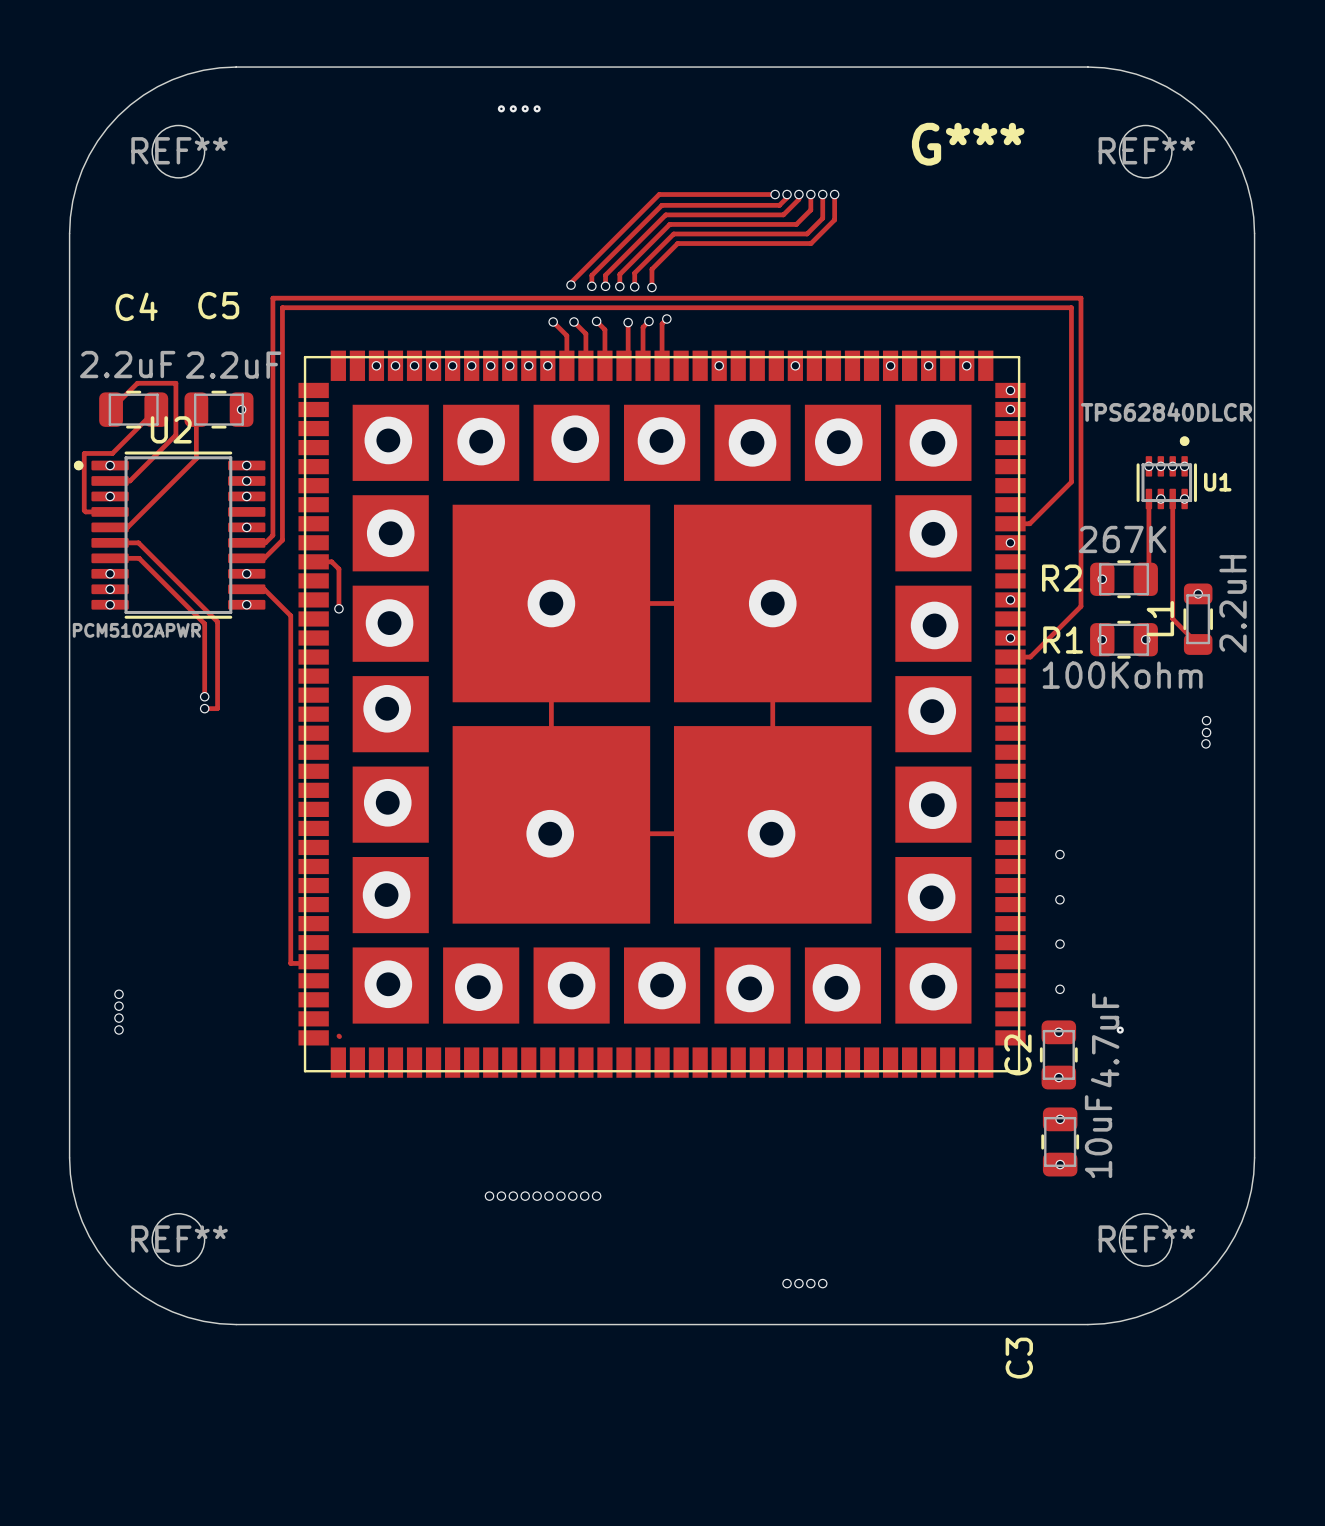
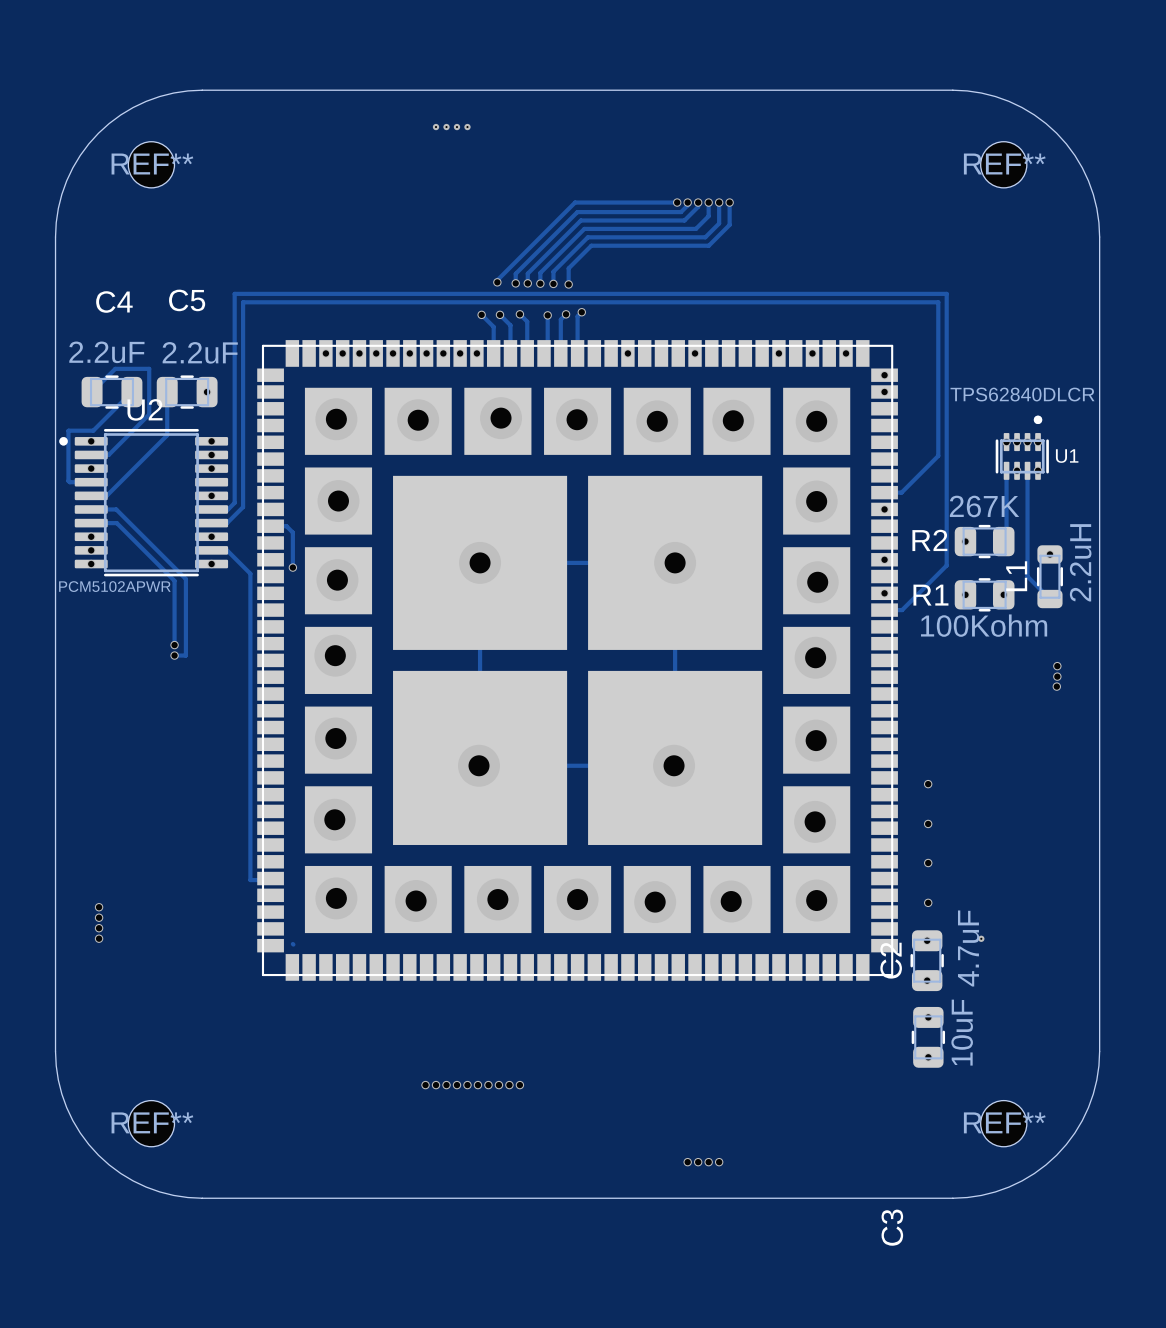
G***: (968, 144) -> none

